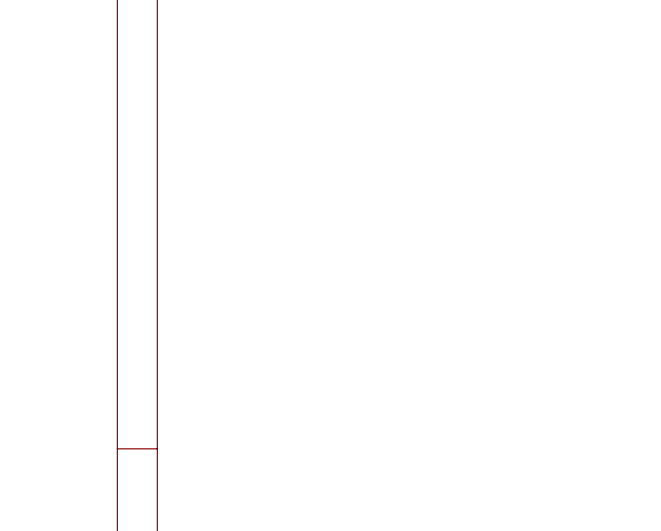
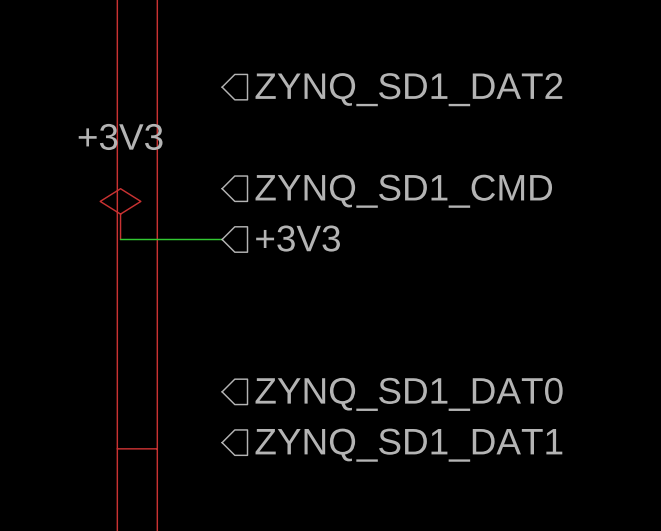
hierarchical label: none -> ZYNQ_SD1_DAT2 (408, 89)
hierarchical label: none -> ZYNQ_SD1_CMD (403, 191)
power symbol: none -> +3V3 (120, 214)
hierarchical label: none -> +3V3 (298, 238)
wire: none -> (120, 239) (222, 239)
hierarchical label: none -> ZYNQ_SD1_DAT0 (409, 394)
hierarchical label: none -> ZYNQ_SD1_DAT1 (408, 445)

